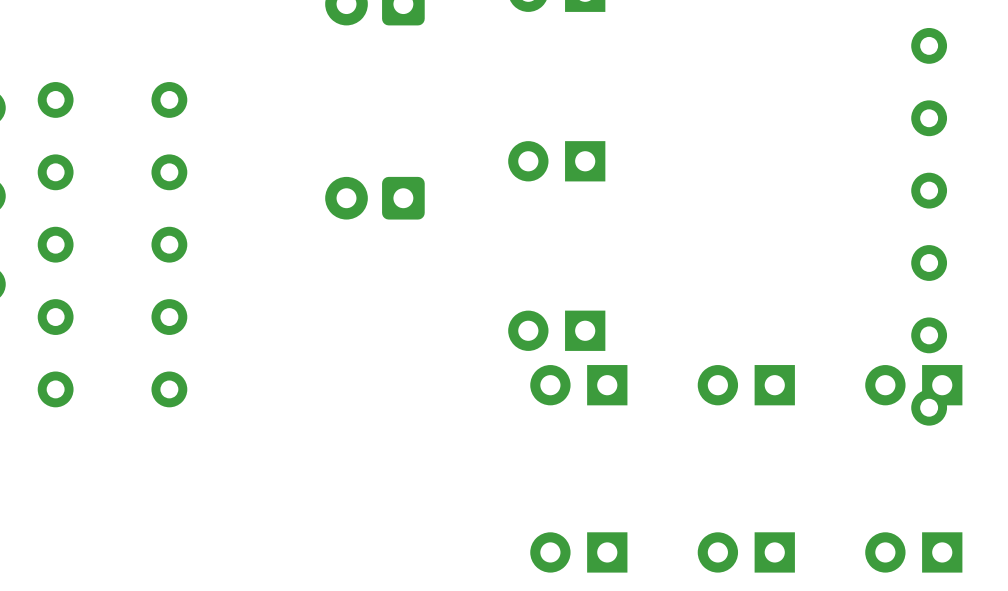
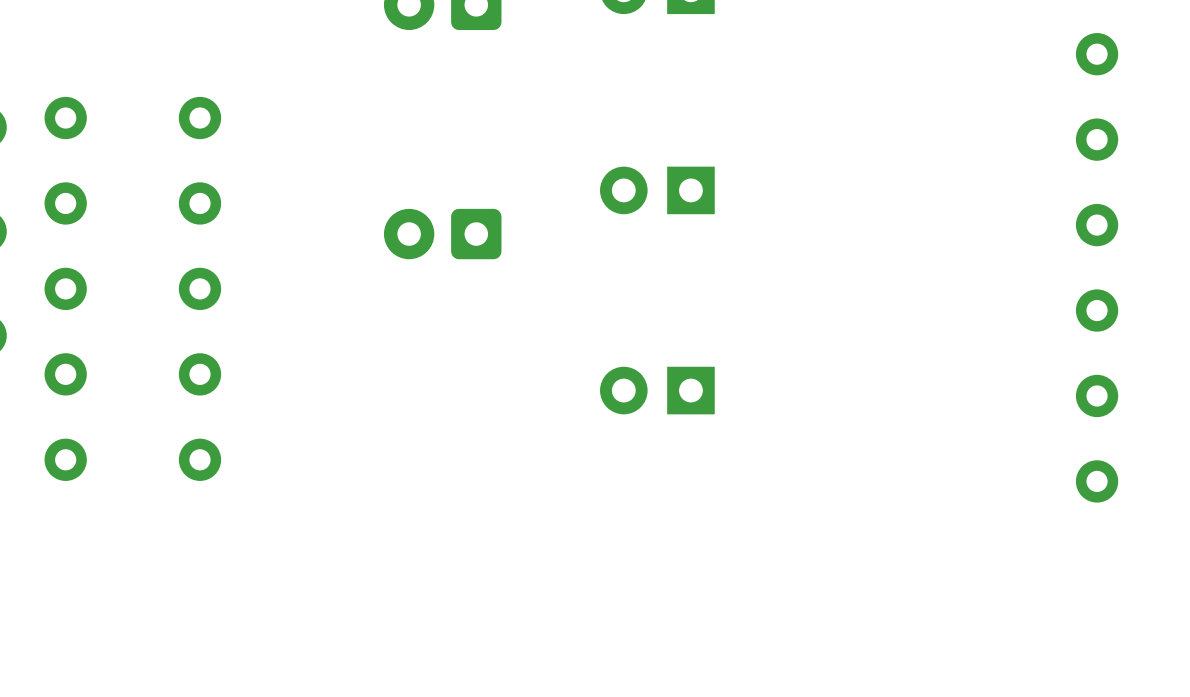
part: (578, 385) -> none
part: (746, 385) -> none
part: (913, 385) -> none
part: (578, 552) -> none
part: (746, 552) -> none
part: (913, 552) -> none

